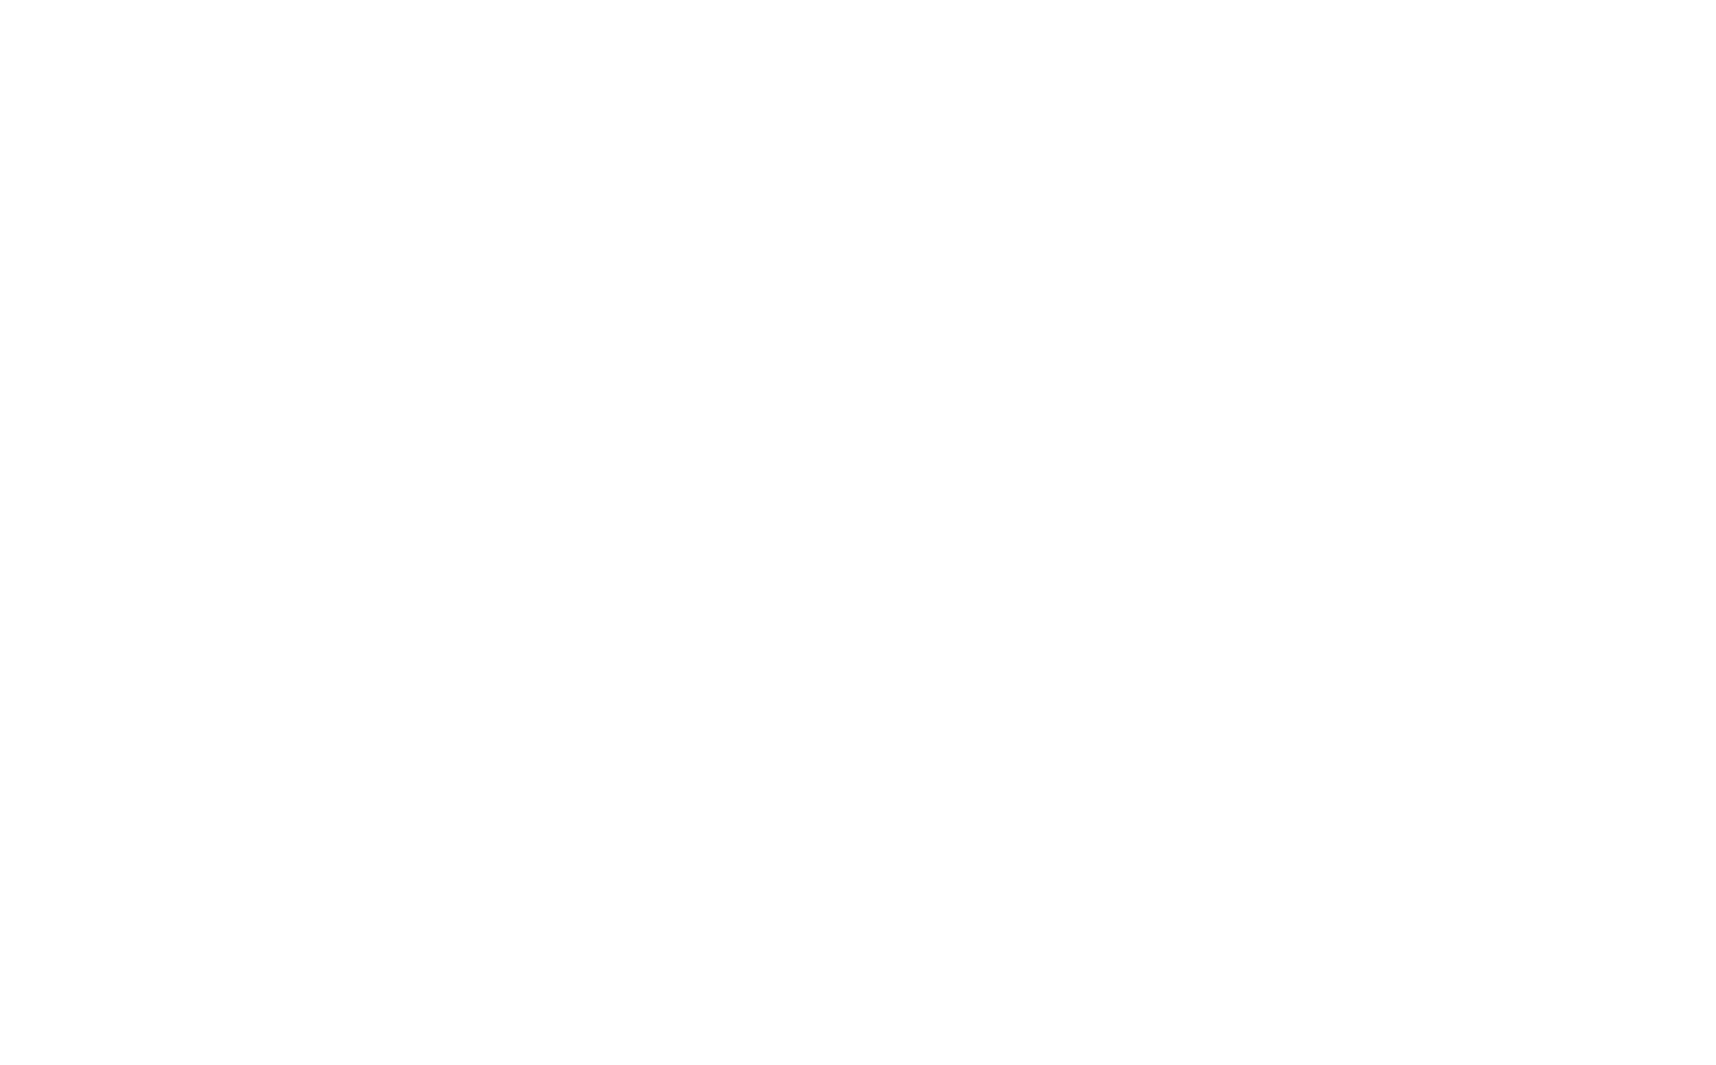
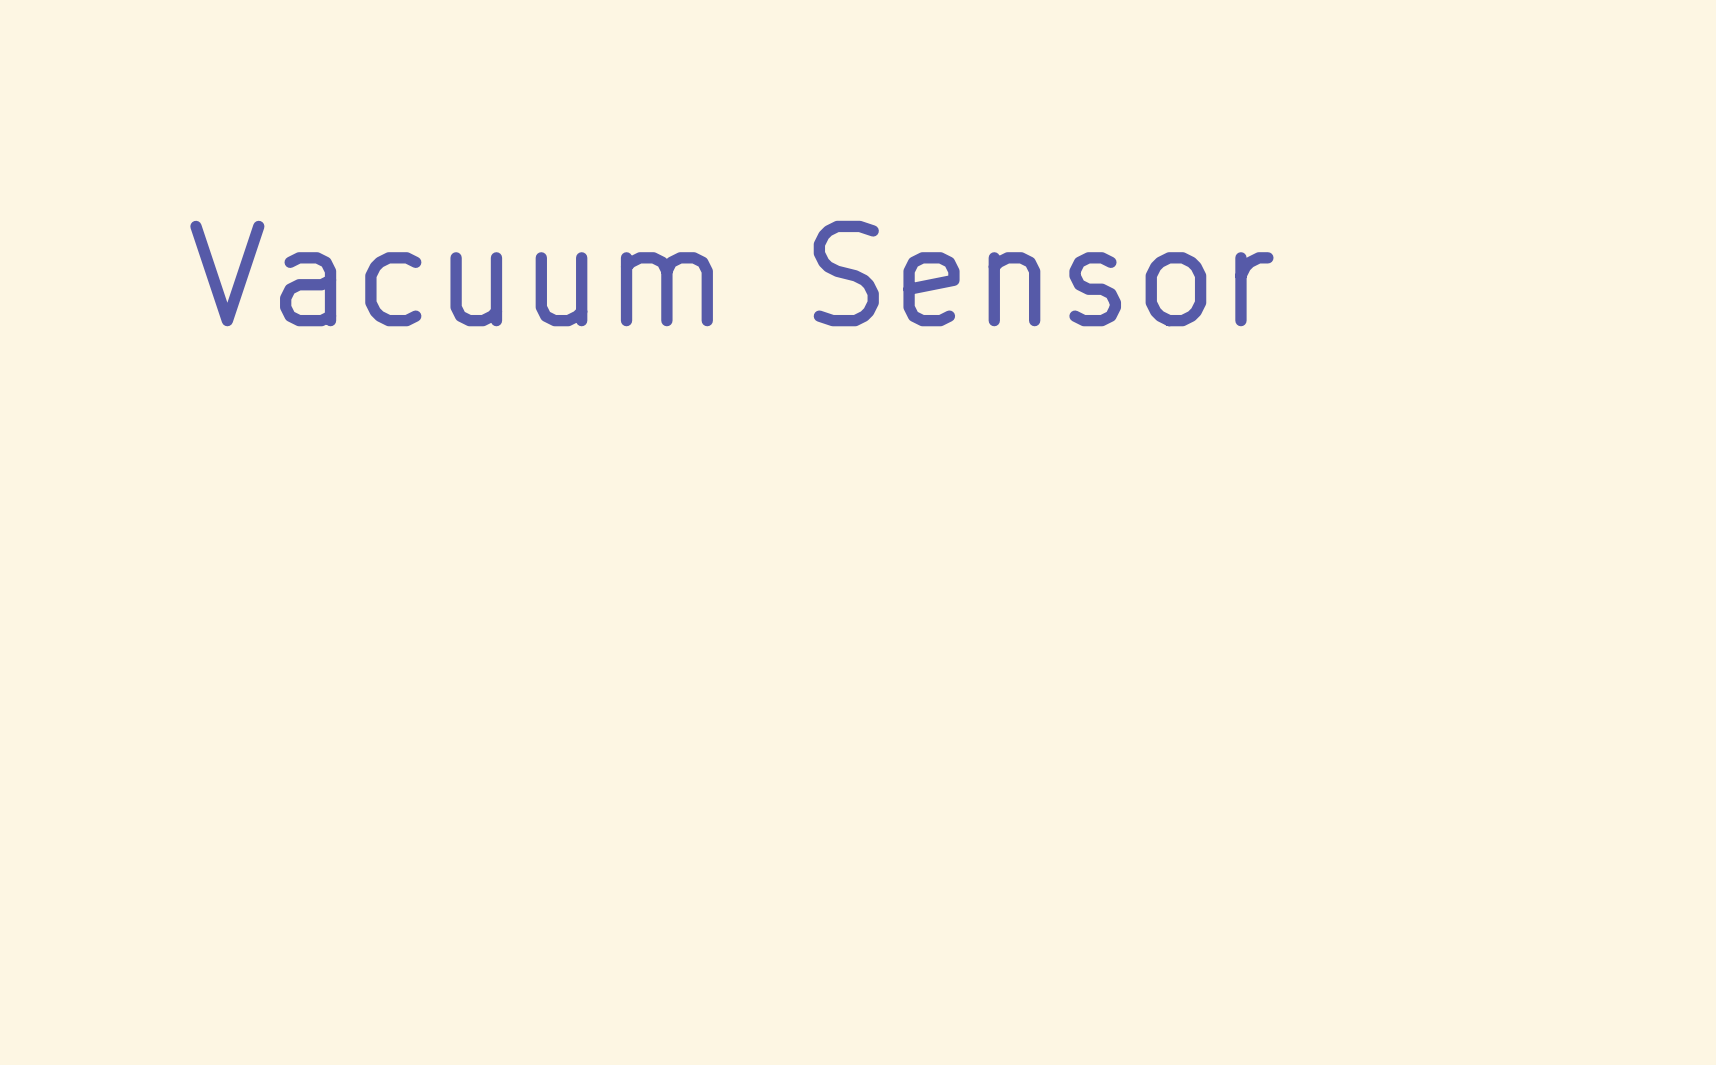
text: none -> Vacuum Sensor (731, 273)

